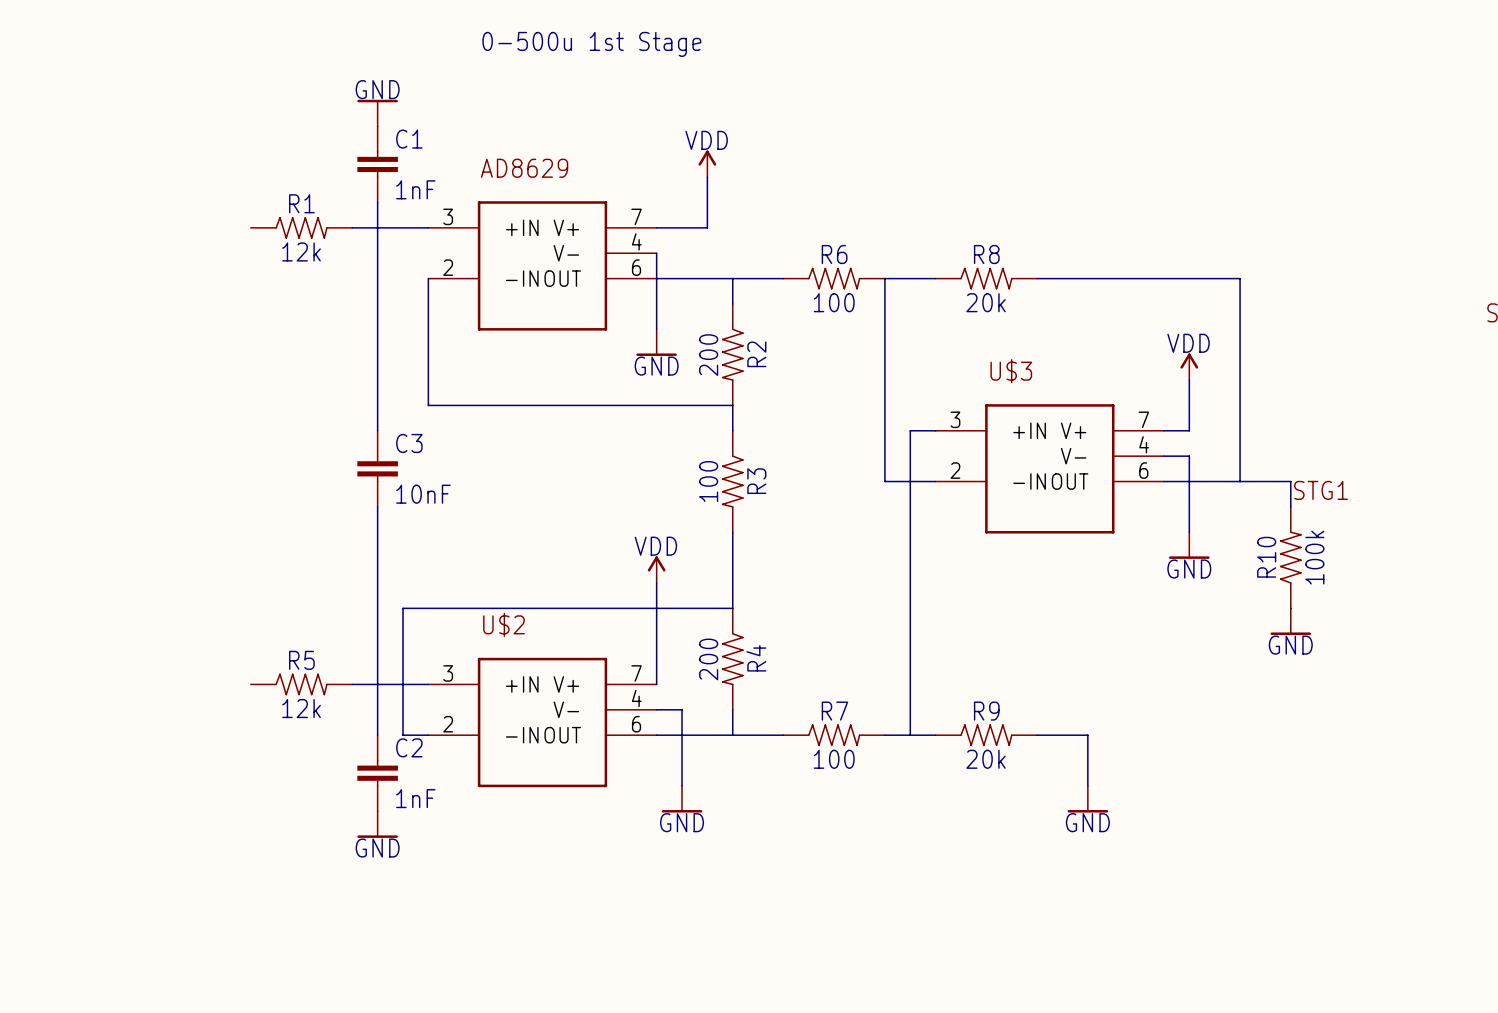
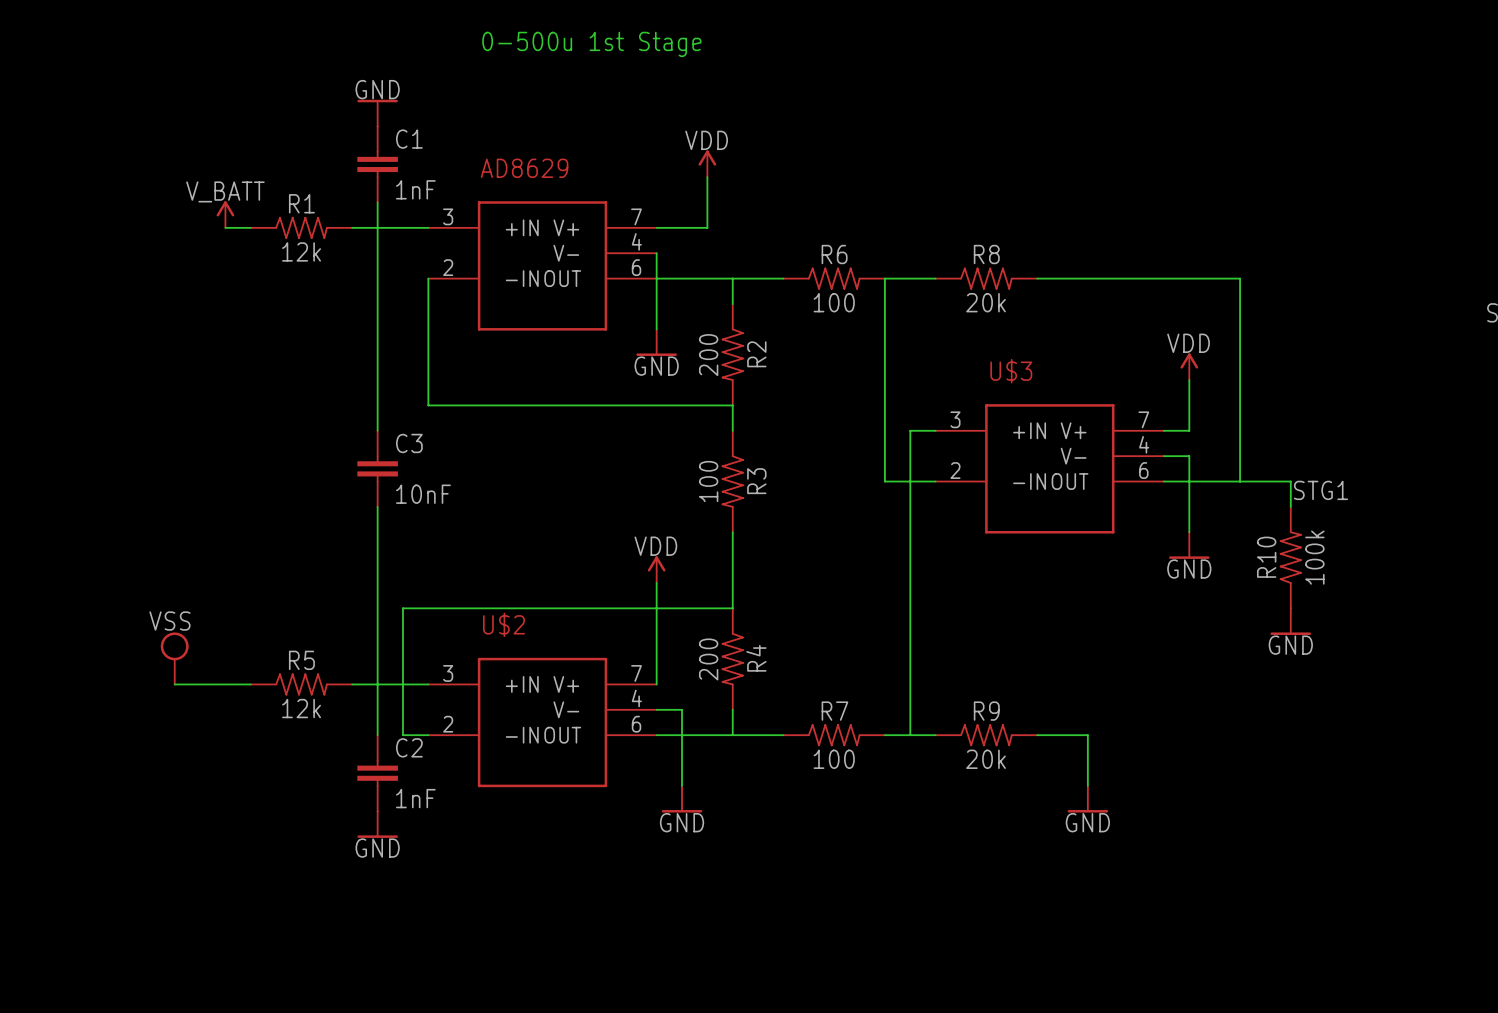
power symbol: none -> V_BATT (225, 214)
wire: none -> (225, 227) (250, 227)
power symbol: none -> VSS (174, 658)
wire: none -> (174, 684) (250, 684)

